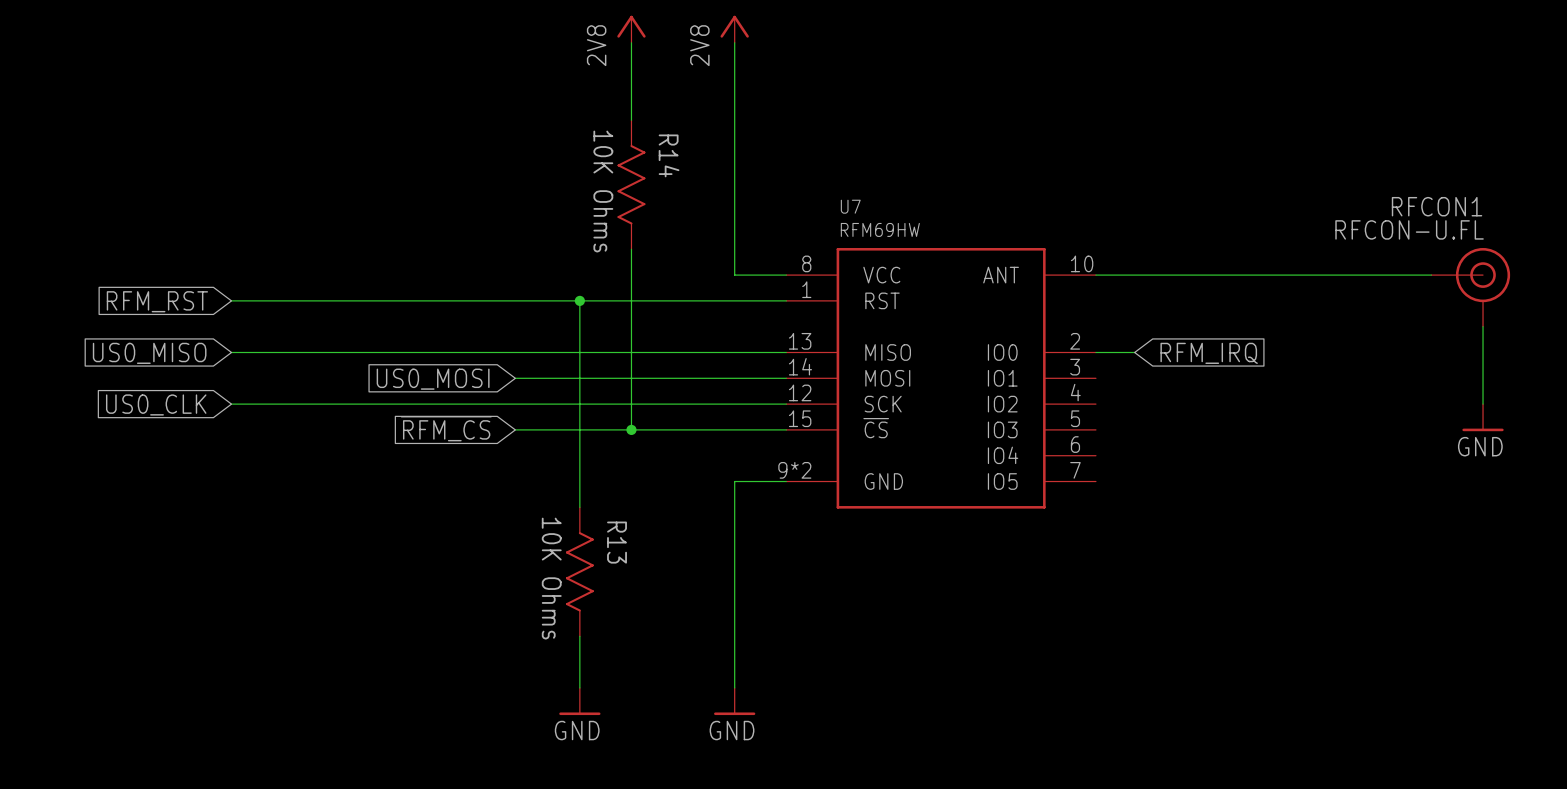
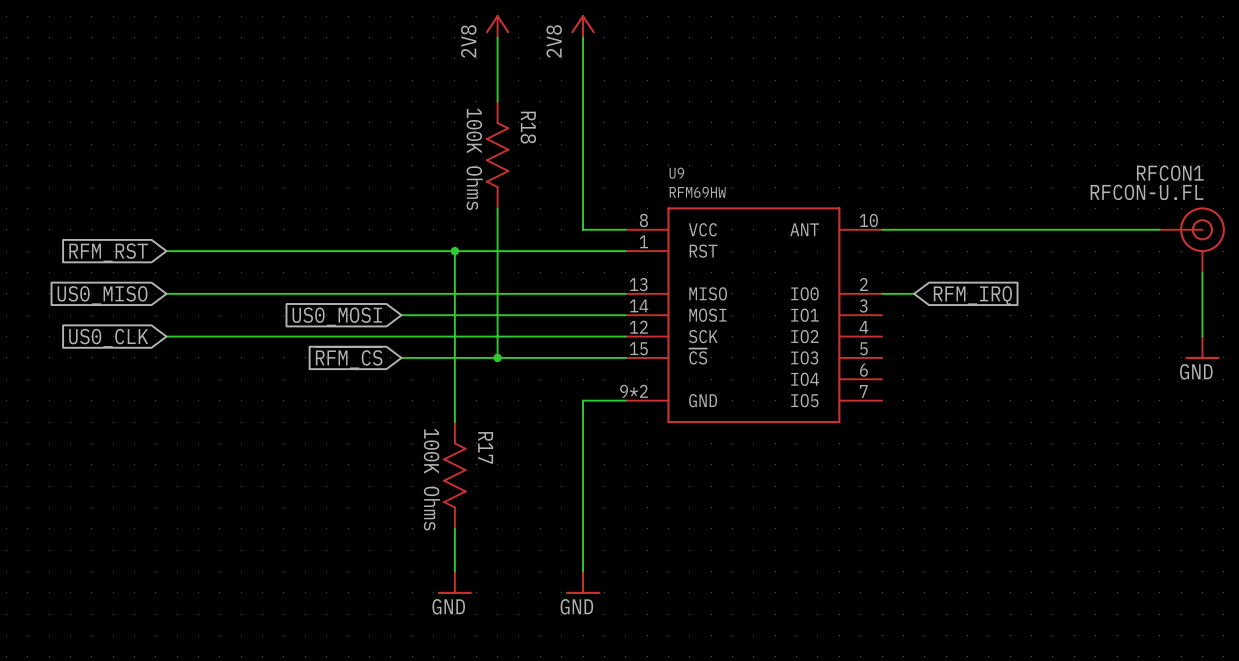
R14 name: R14 (669, 155) -> R18 (528, 127)
R14 value: 10K Ohms (603, 191) -> 100K Ohms (474, 159)
U7 name: U7 (850, 206) -> U9 (676, 173)
R13 name: R13 (617, 542) -> R17 (485, 447)
R13 value: 10K Ohms (551, 578) -> 100K Ohms (431, 479)

